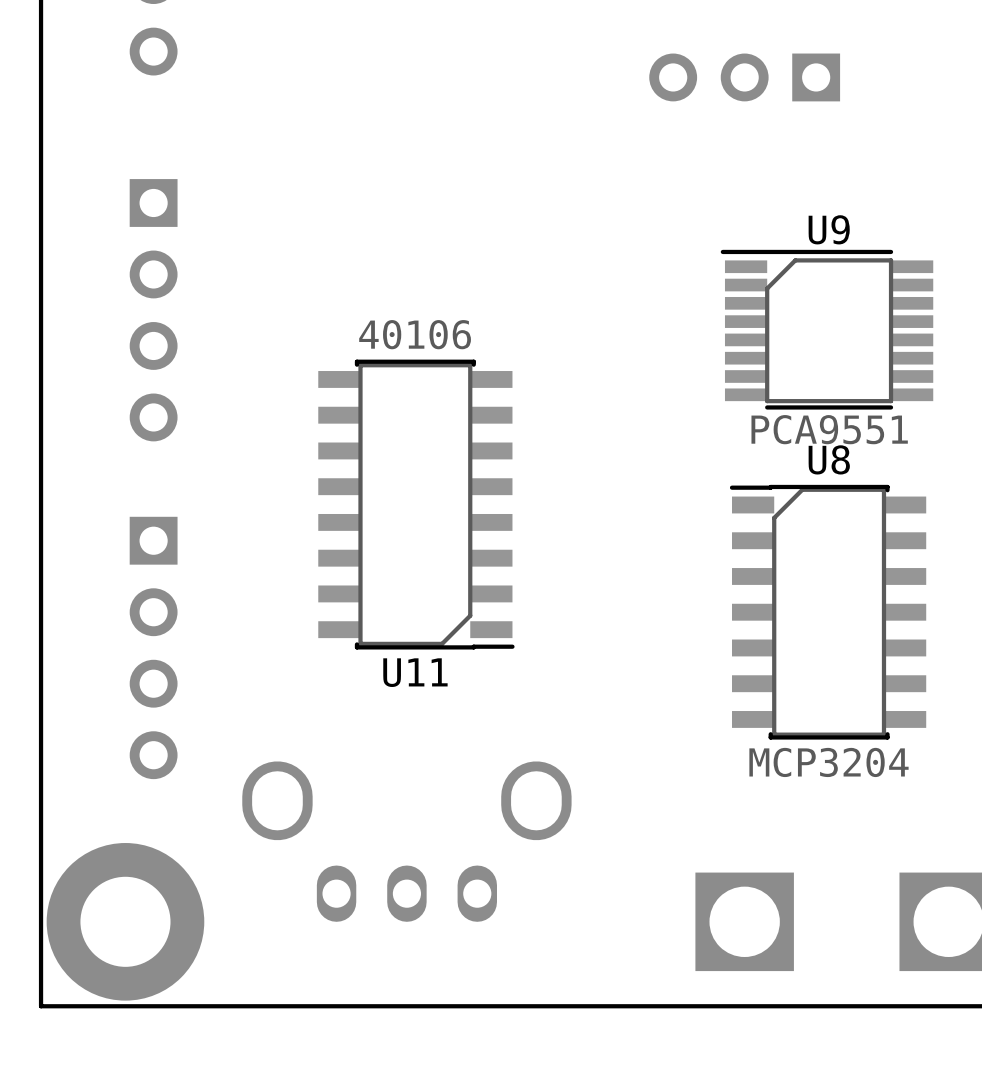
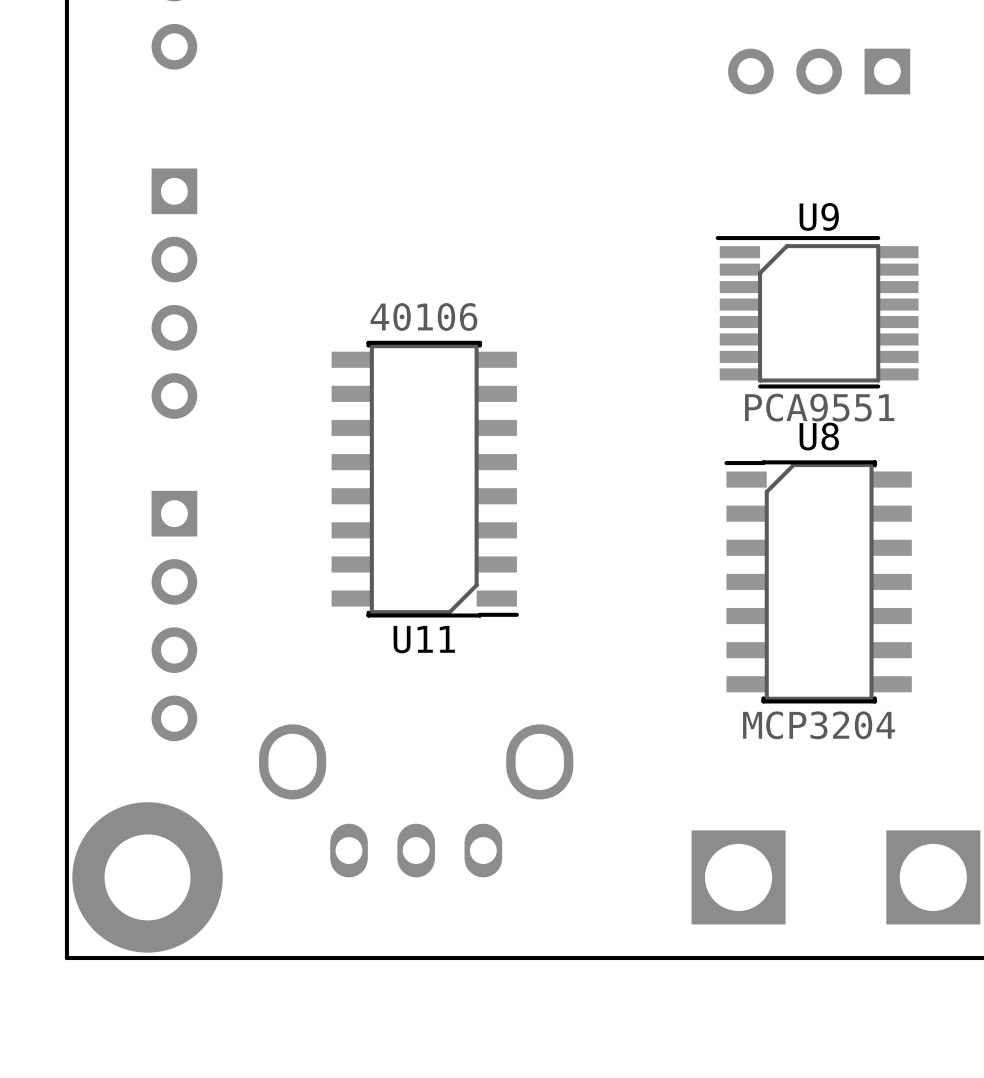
part: (744, 77) -> none
part: none -> (819, 71)

